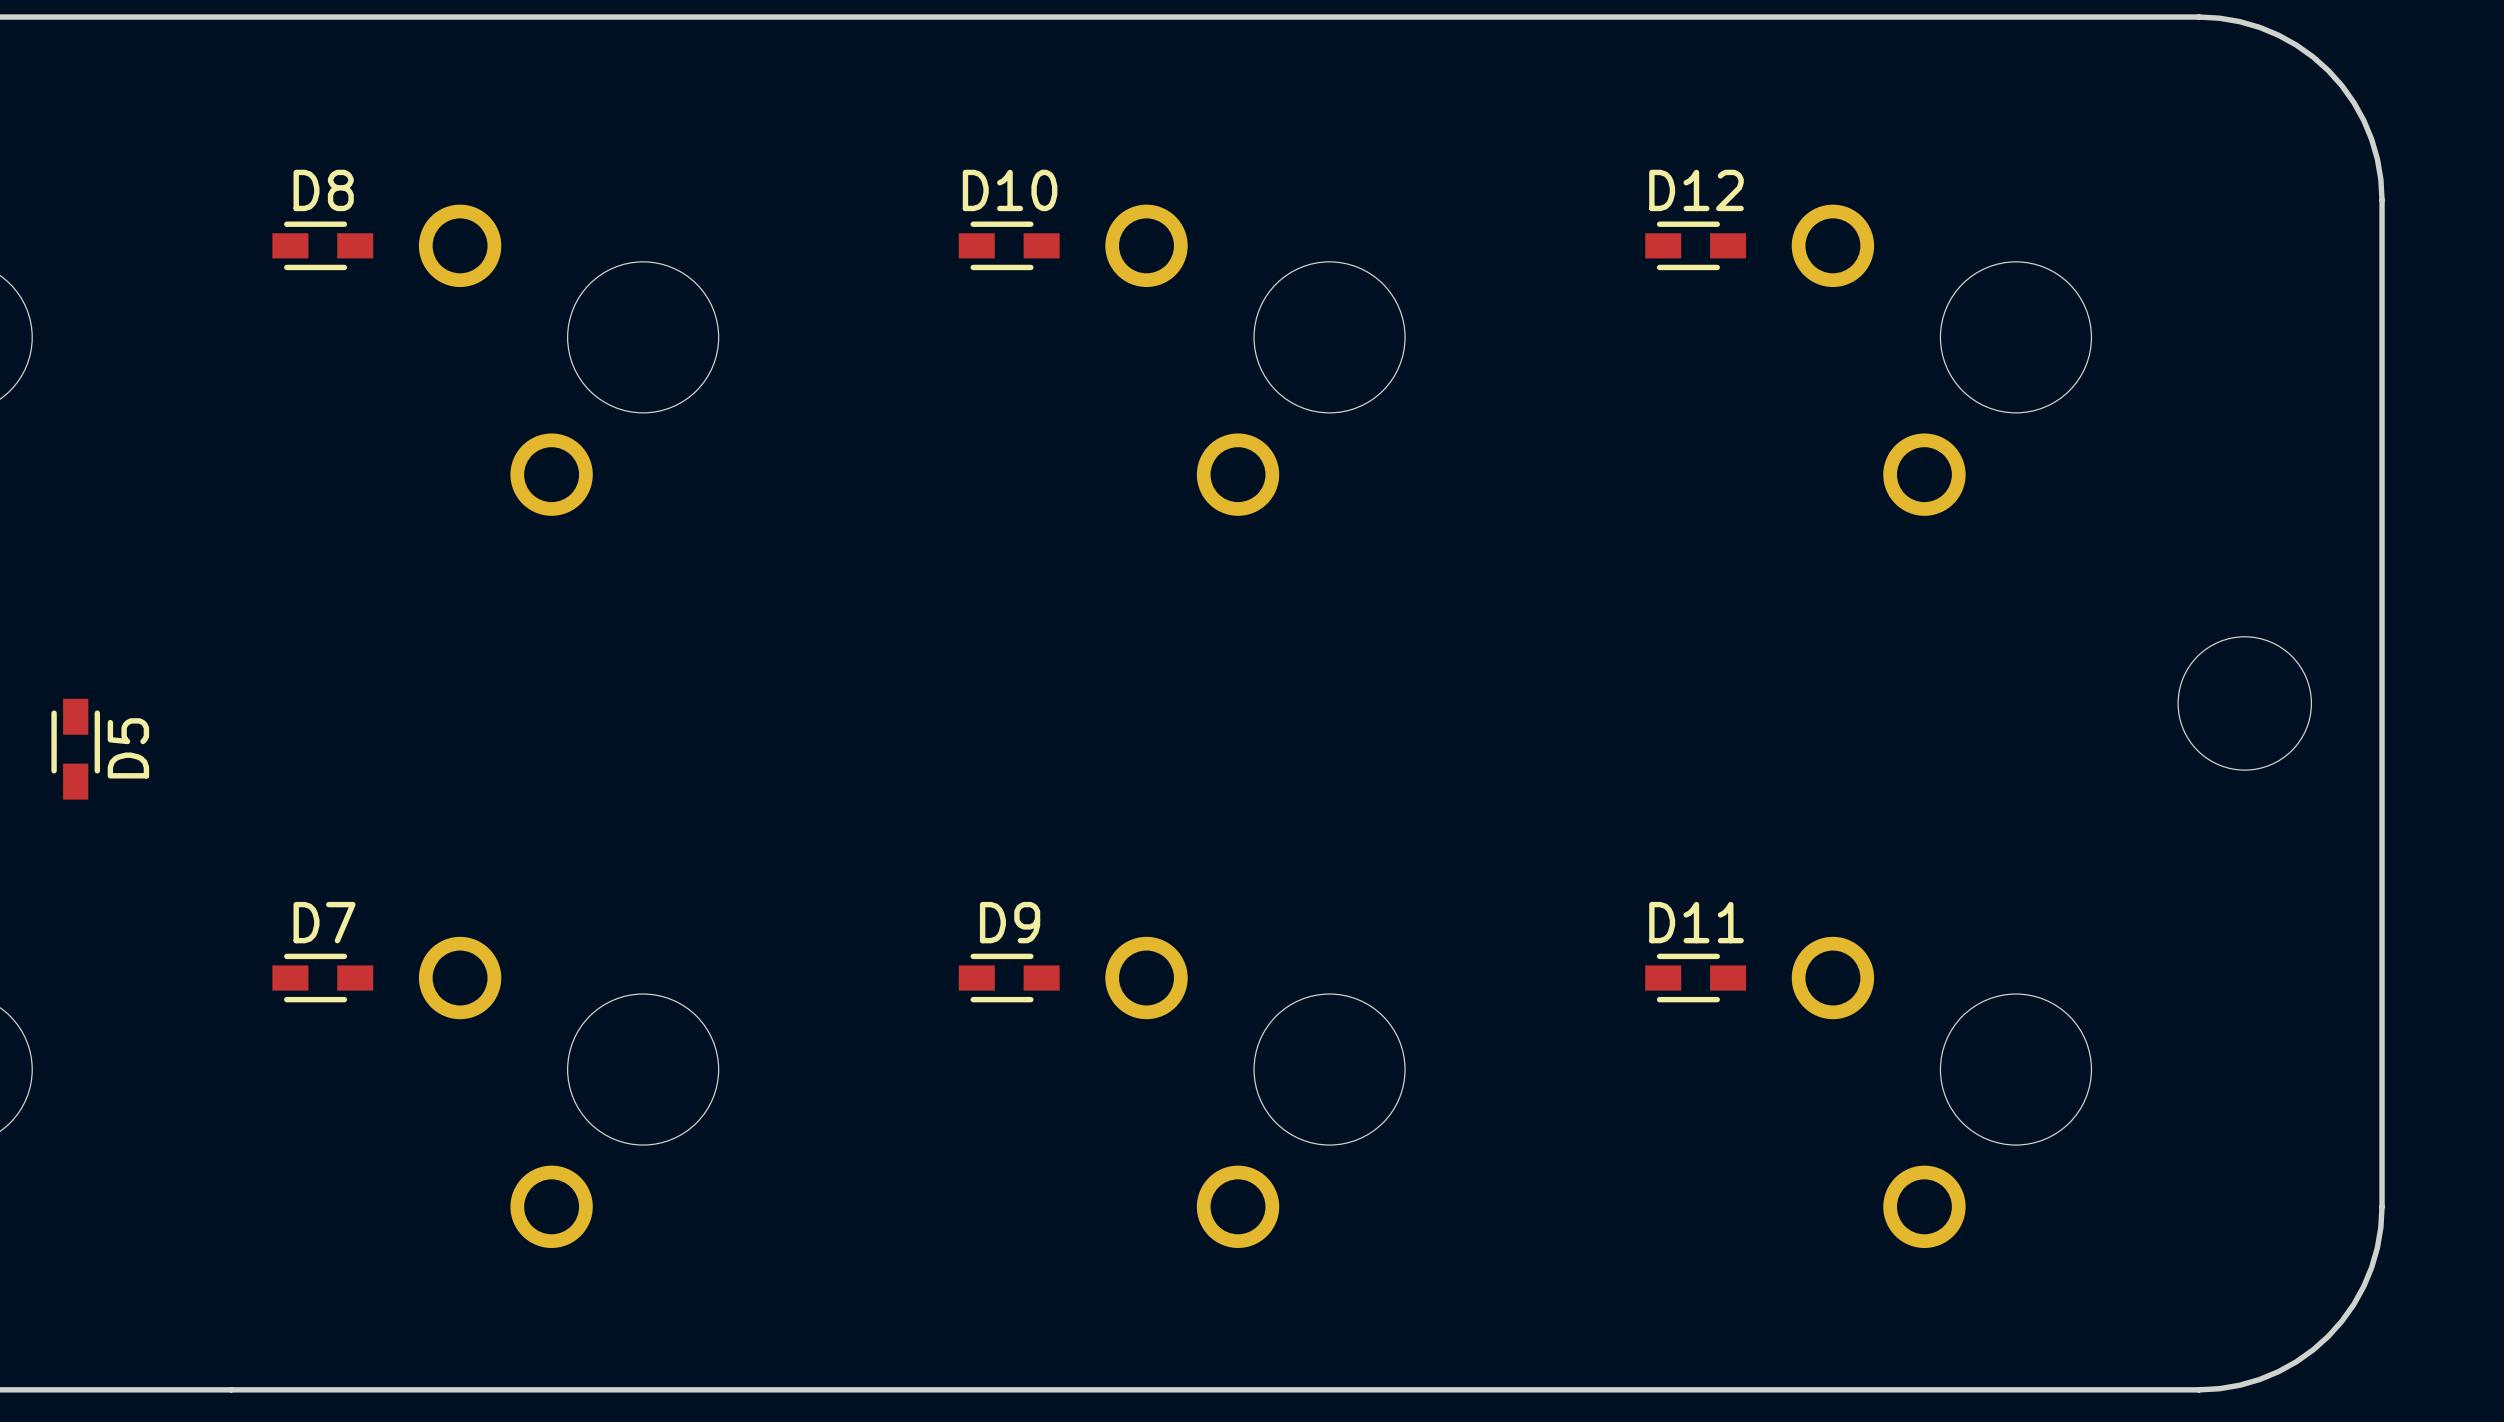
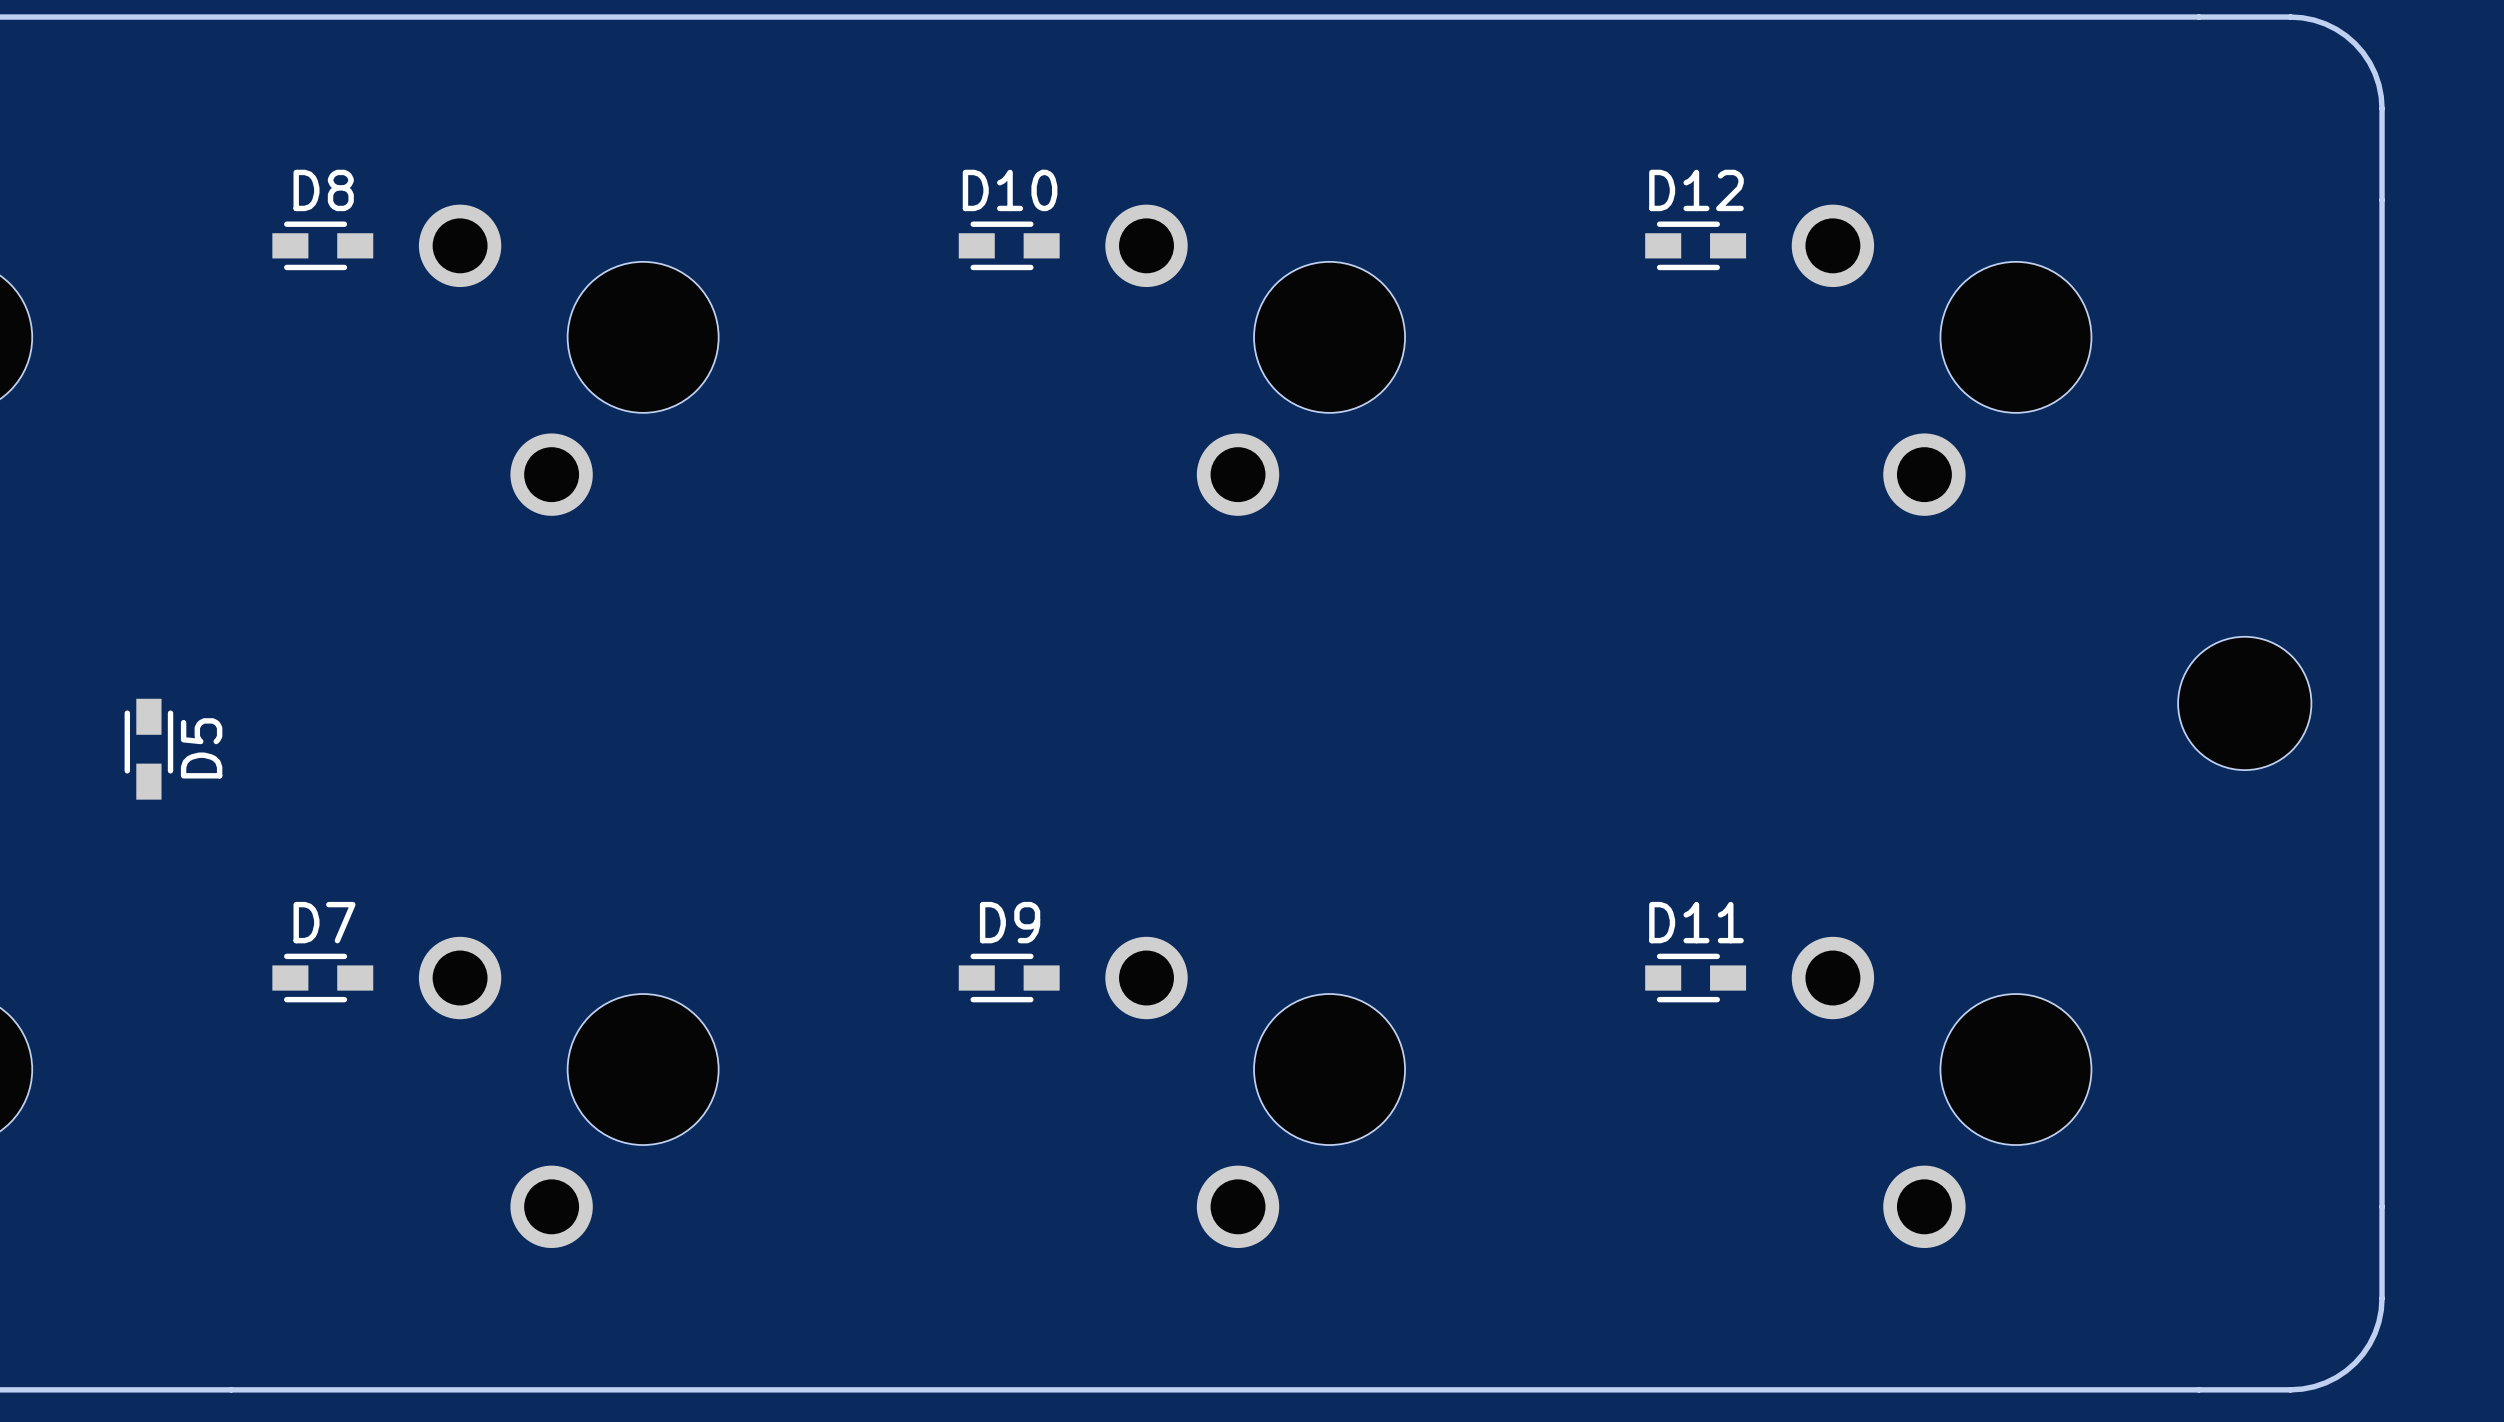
board edge: (2198, 17) (2239, 21) (2278, 35) (2296, 45) (2328, 70) (2353, 102) (2363, 120) (2377, 159) (2382, 200) -> (2198, 17) (2302, 17) (2314, 20) (2336, 29) (2355, 43) (2369, 62) (2375, 73) (2381, 96) (2382, 200)
D5 position: (75, 749) -> (148, 749)
board edge: (2382, 1206) (2377, 1247) (2363, 1286) (2353, 1304) (2328, 1336) (2296, 1361) (2259, 1379) (2219, 1388) (2198, 1389) -> (2382, 1206) (2381, 1310) (2378, 1322) (2369, 1344) (2355, 1363) (2336, 1377) (2314, 1386) (2302, 1389) (2198, 1389)

